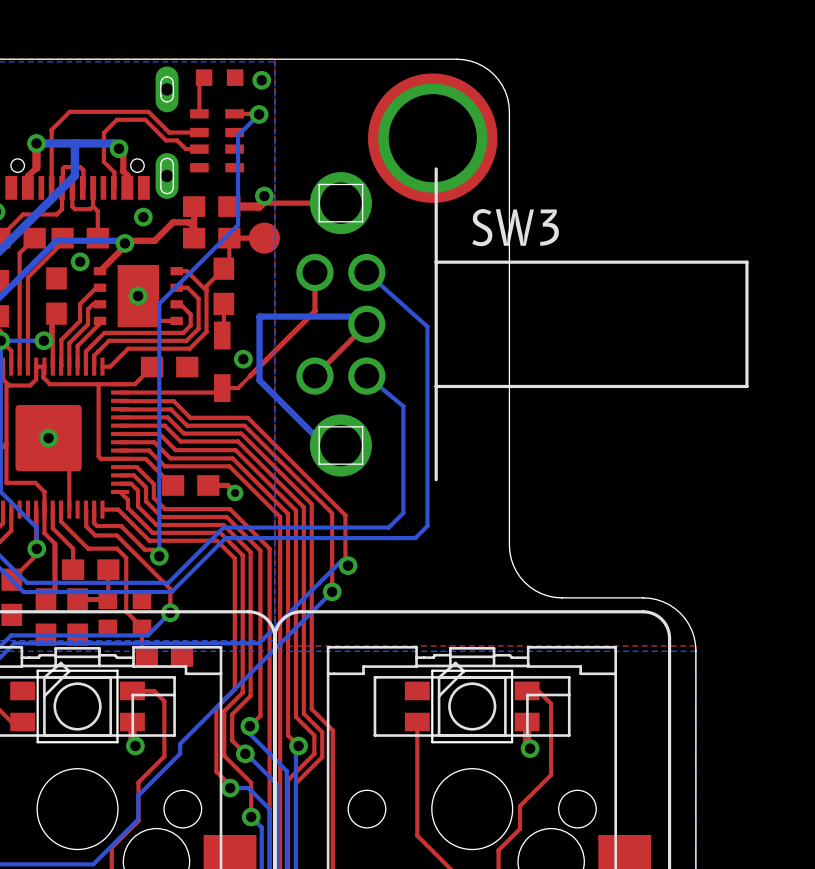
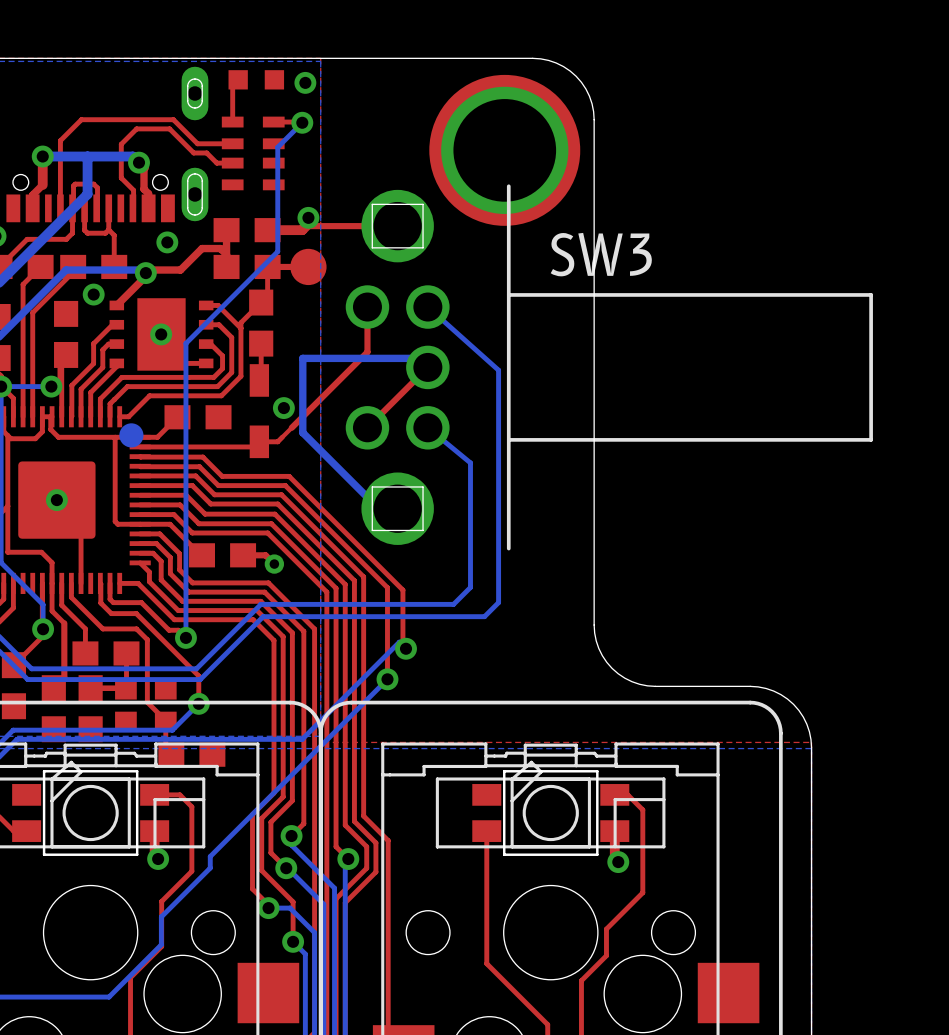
part: none -> (131, 435)

